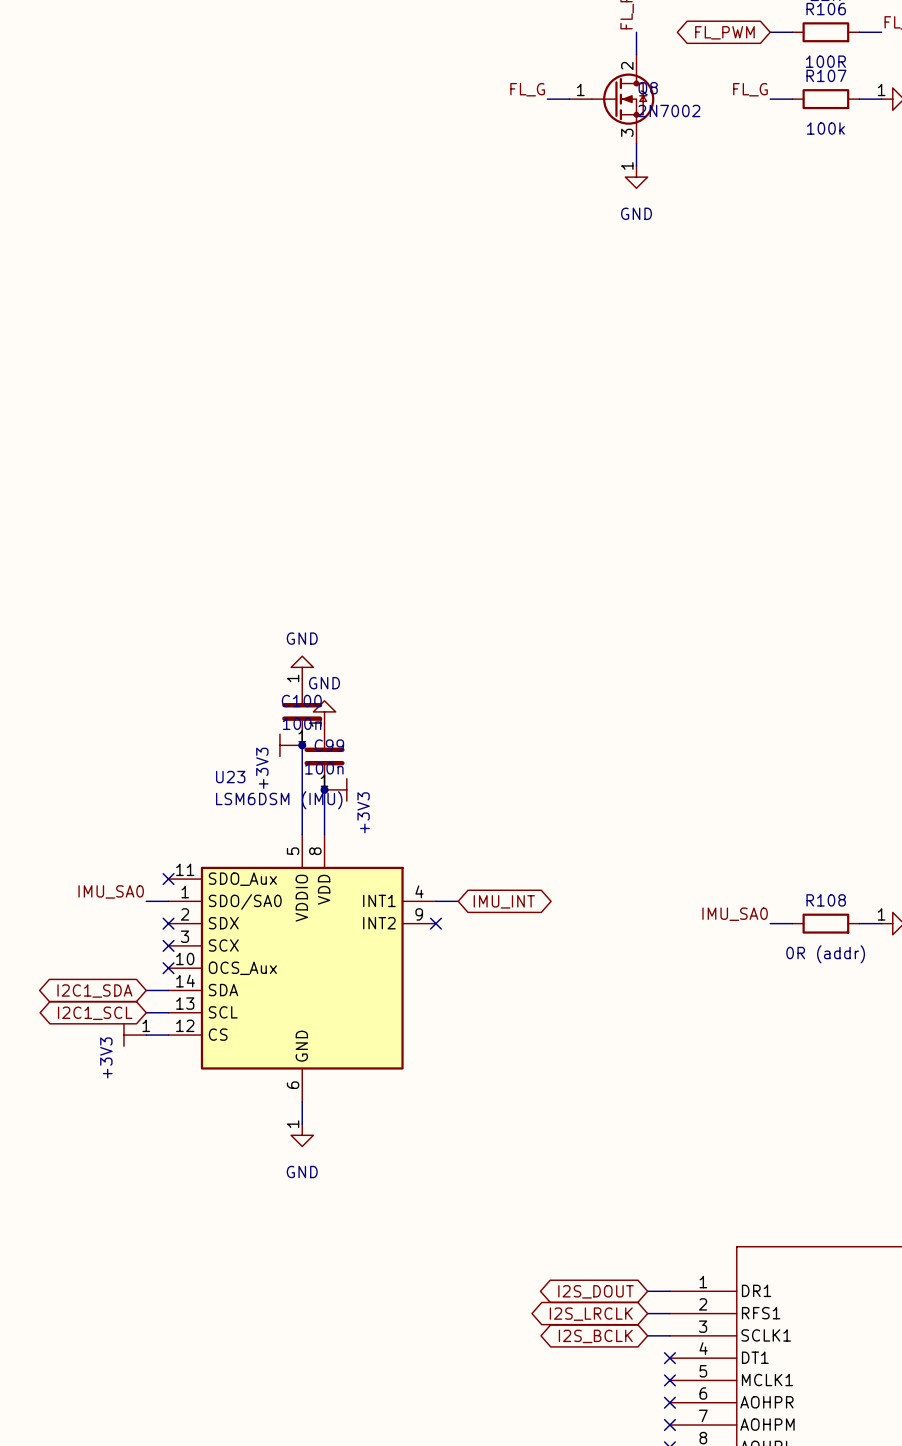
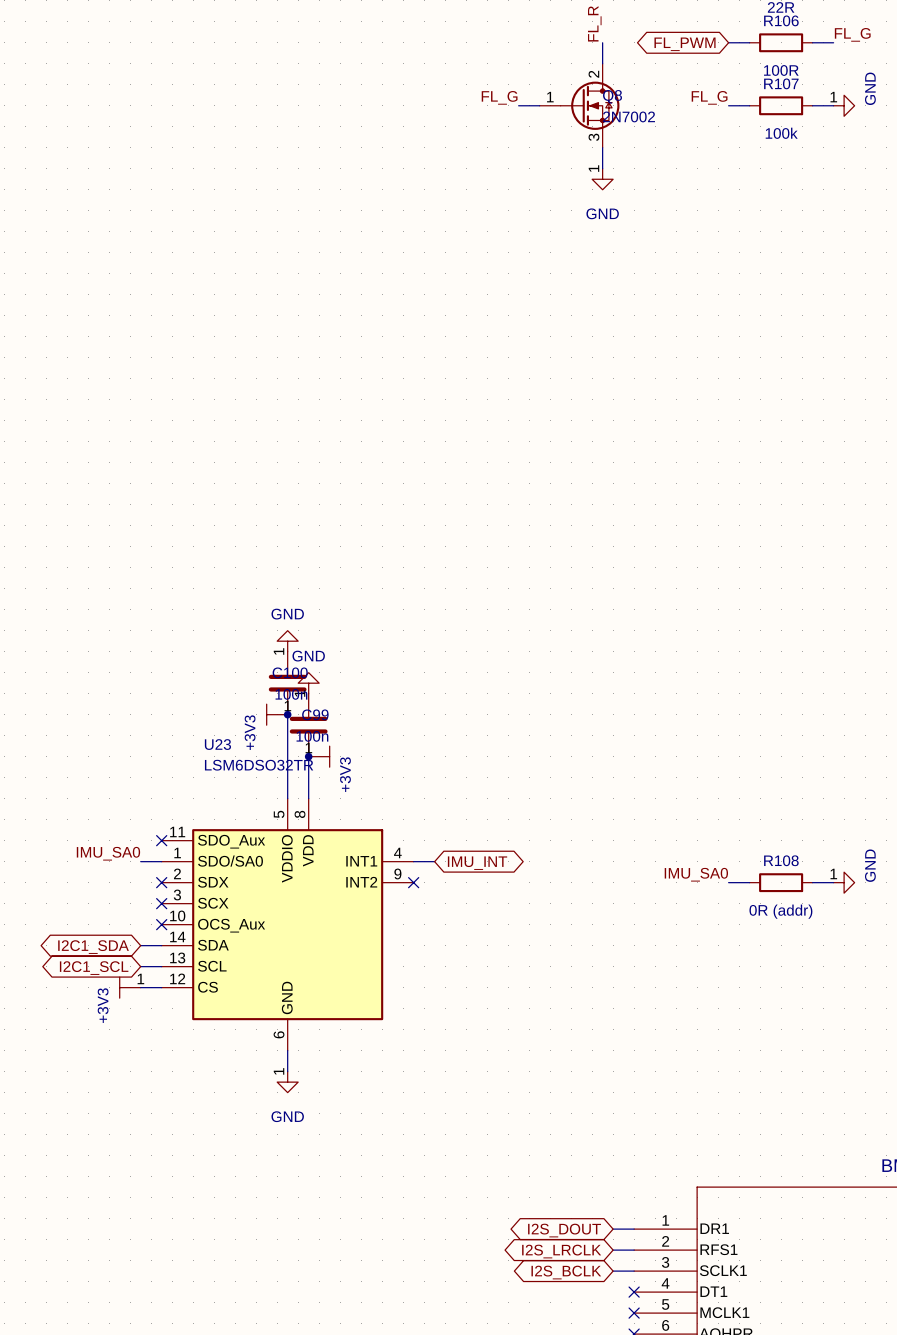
U23 value: LSM6DSM (IMU) (279, 800) -> LSM6DSO32TR (259, 765)

